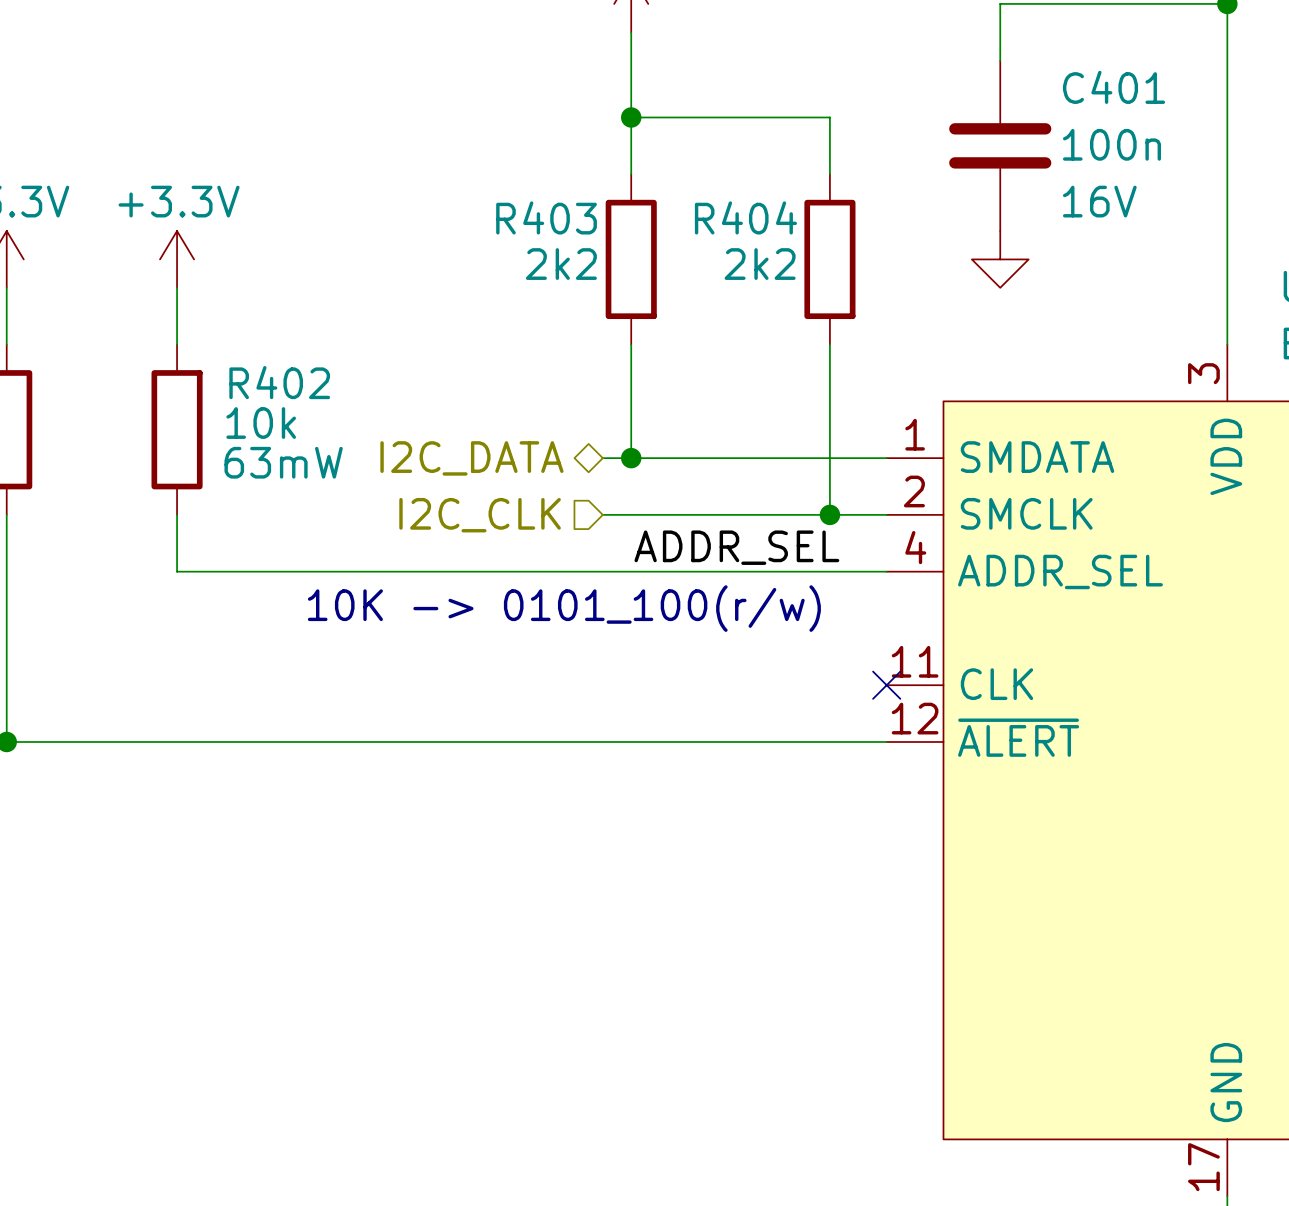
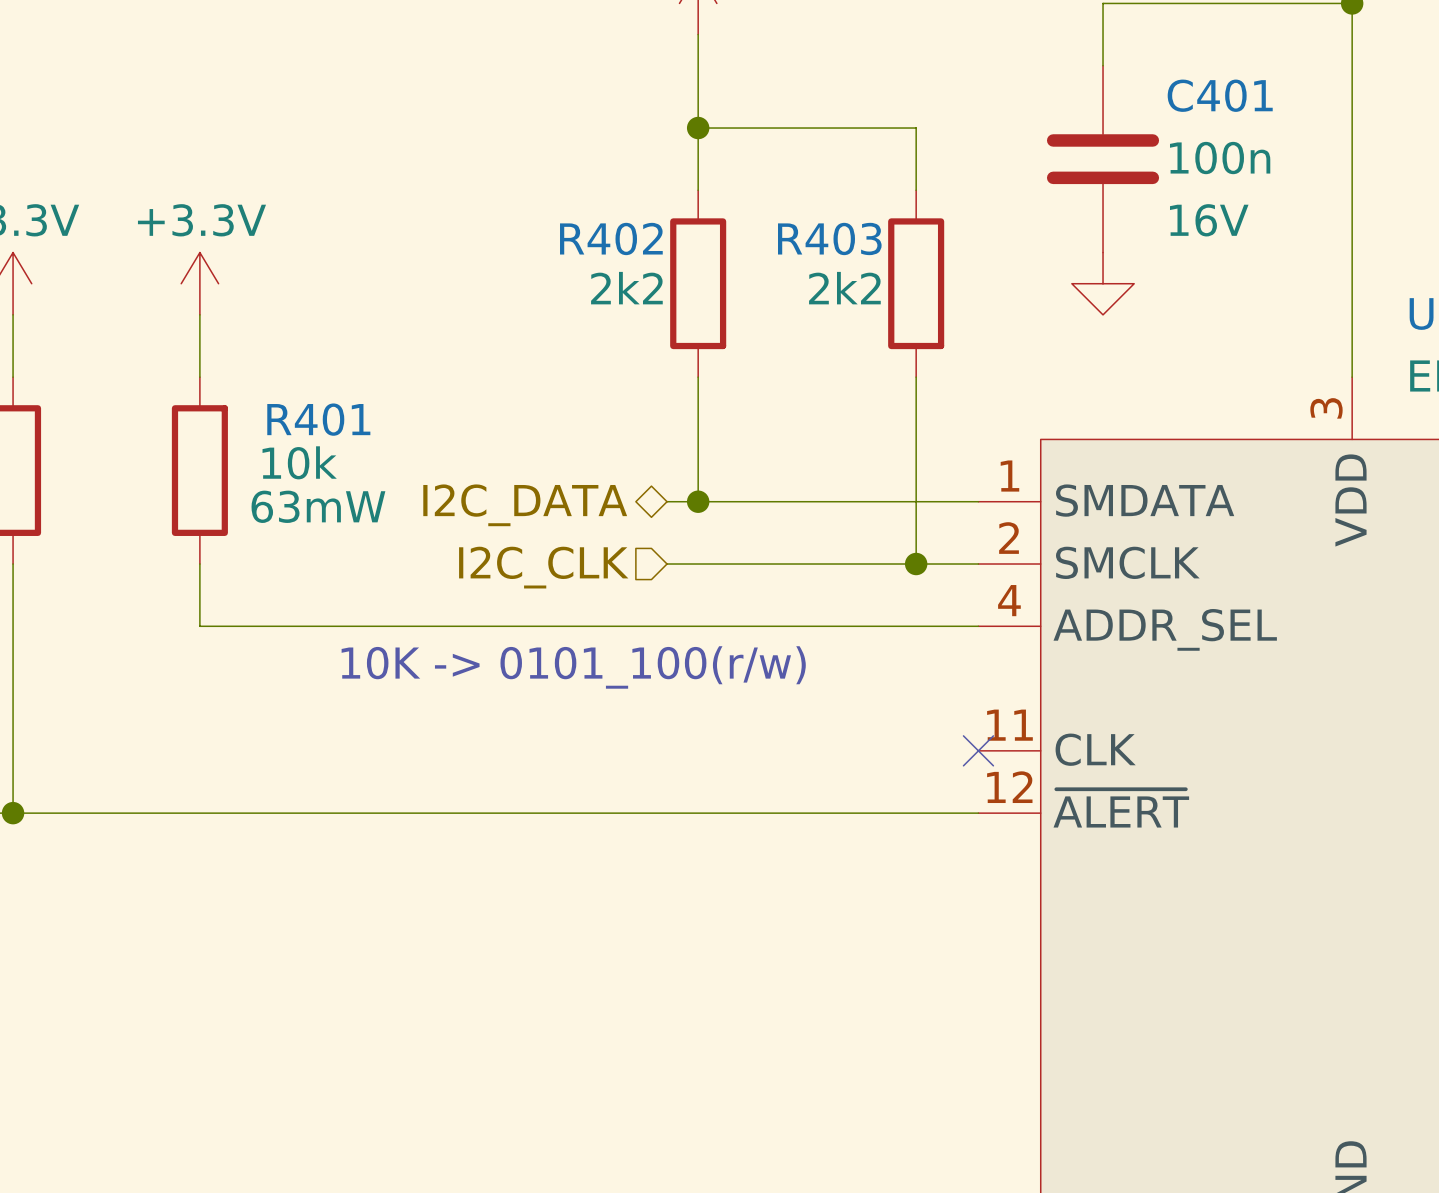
R403 name: R403 (546, 217) -> R402 (611, 238)
R404 name: R404 (745, 217) -> R403 (829, 238)
R402 name: R402 (279, 382) -> R401 (318, 419)
label: ADDR_SEL (736, 547) -> none

